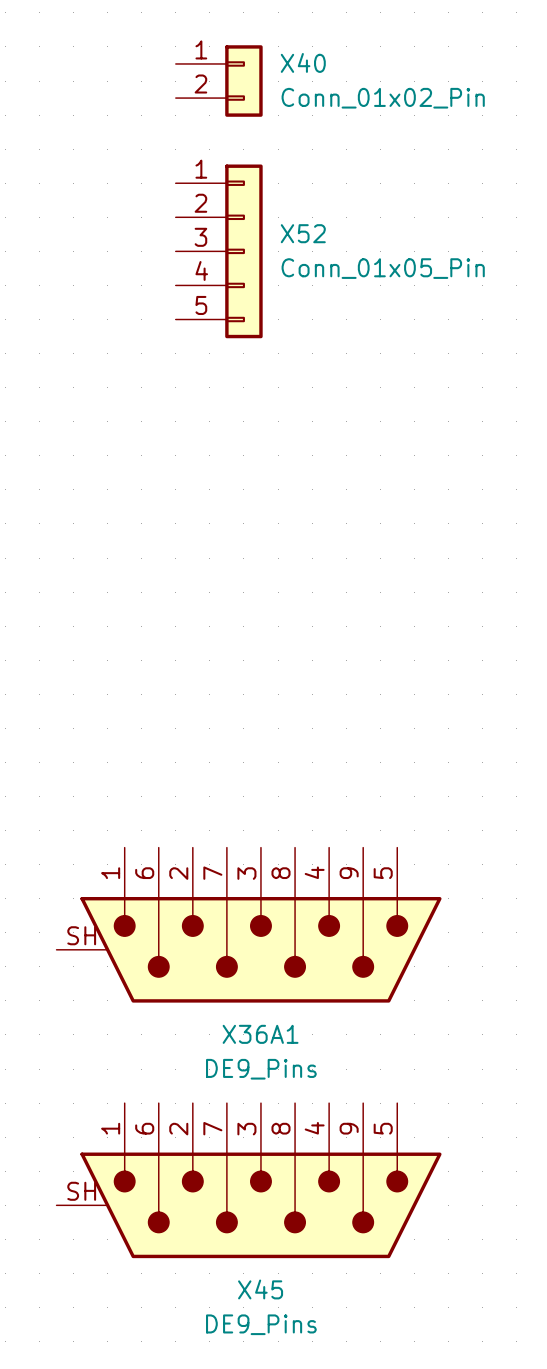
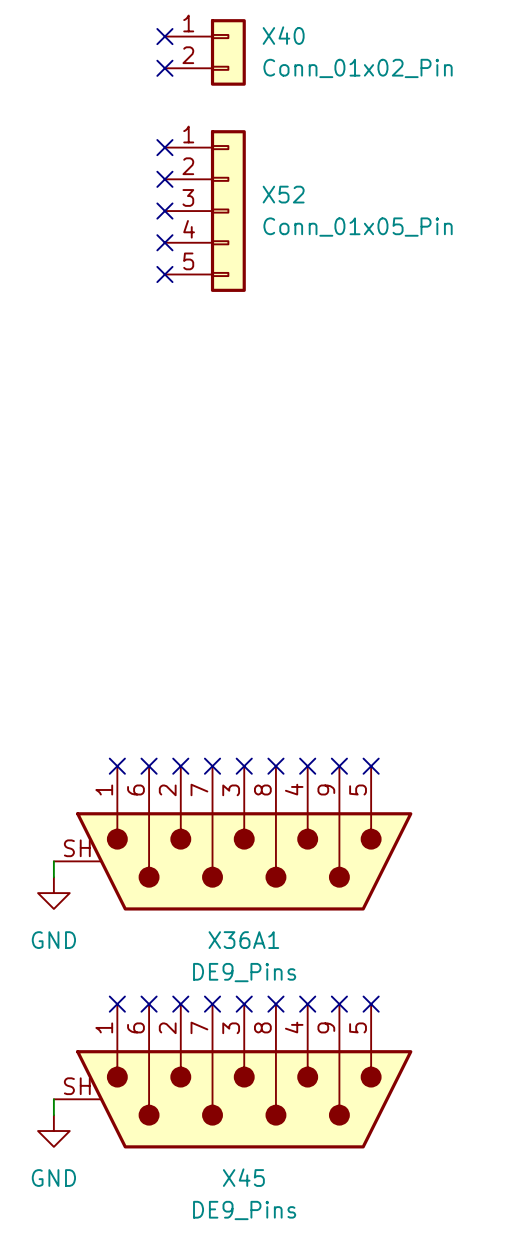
no-connect mark: none -> (164, 36)
no-connect mark: none -> (164, 68)
no-connect mark: none -> (164, 147)
no-connect mark: none -> (164, 179)
no-connect mark: none -> (164, 211)
no-connect mark: none -> (164, 242)
no-connect mark: none -> (164, 274)
no-connect mark: none -> (117, 766)
no-connect mark: none -> (149, 766)
no-connect mark: none -> (180, 766)
no-connect mark: none -> (212, 766)
no-connect mark: none -> (244, 766)
no-connect mark: none -> (275, 766)
no-connect mark: none -> (307, 766)
no-connect mark: none -> (339, 766)
no-connect mark: none -> (371, 766)
wire: none -> (53, 861) (53, 877)
power symbol: none -> GND (53, 893)
no-connect mark: none -> (117, 1004)
no-connect mark: none -> (149, 1004)
no-connect mark: none -> (180, 1004)
no-connect mark: none -> (212, 1004)
no-connect mark: none -> (244, 1004)
no-connect mark: none -> (275, 1004)
no-connect mark: none -> (307, 1004)
no-connect mark: none -> (339, 1004)
no-connect mark: none -> (371, 1004)
wire: none -> (53, 1099) (53, 1115)
power symbol: none -> GND (53, 1131)

